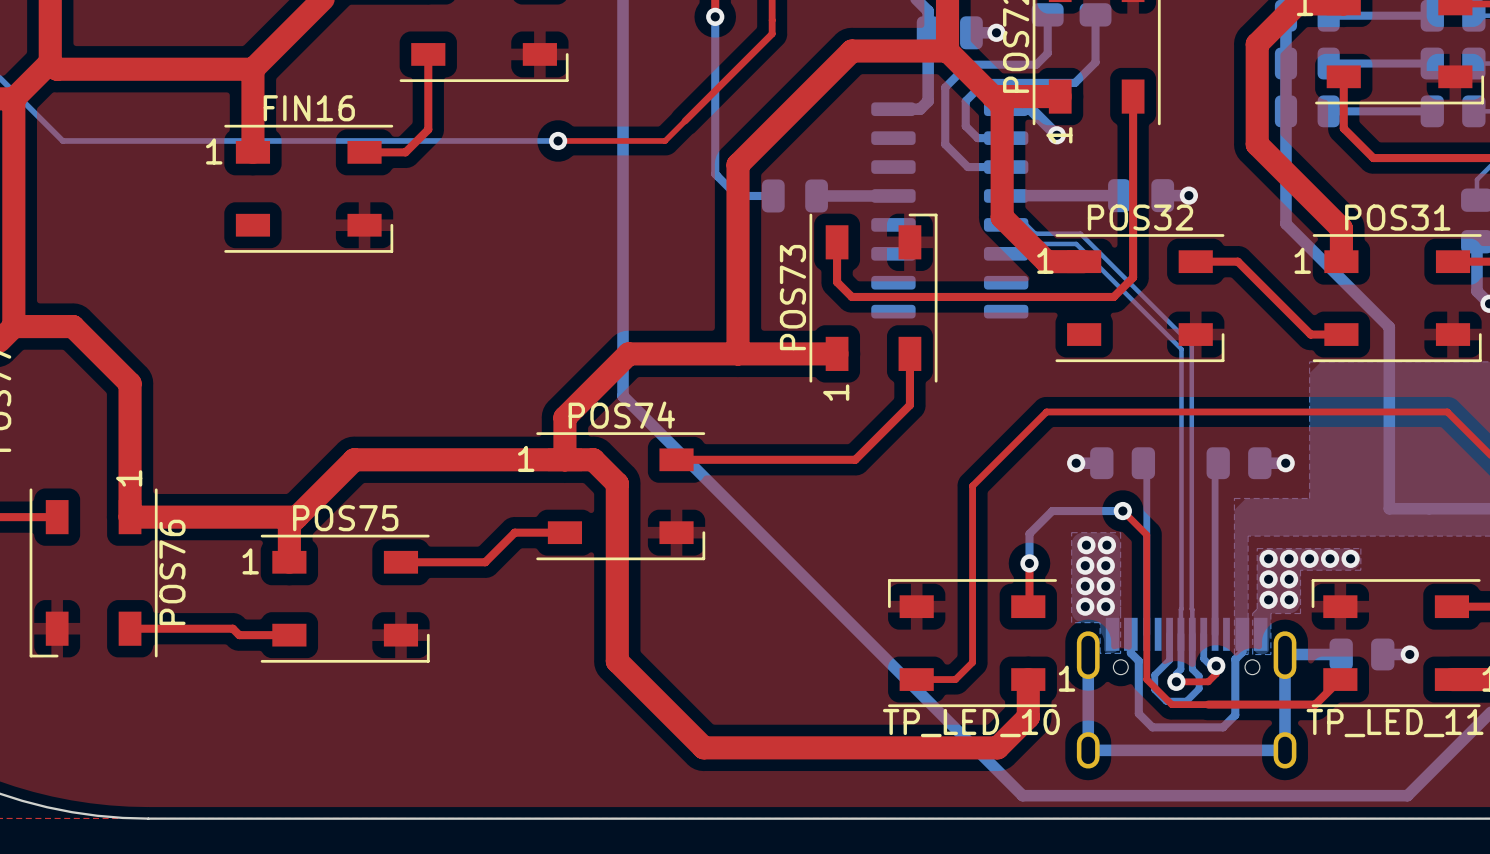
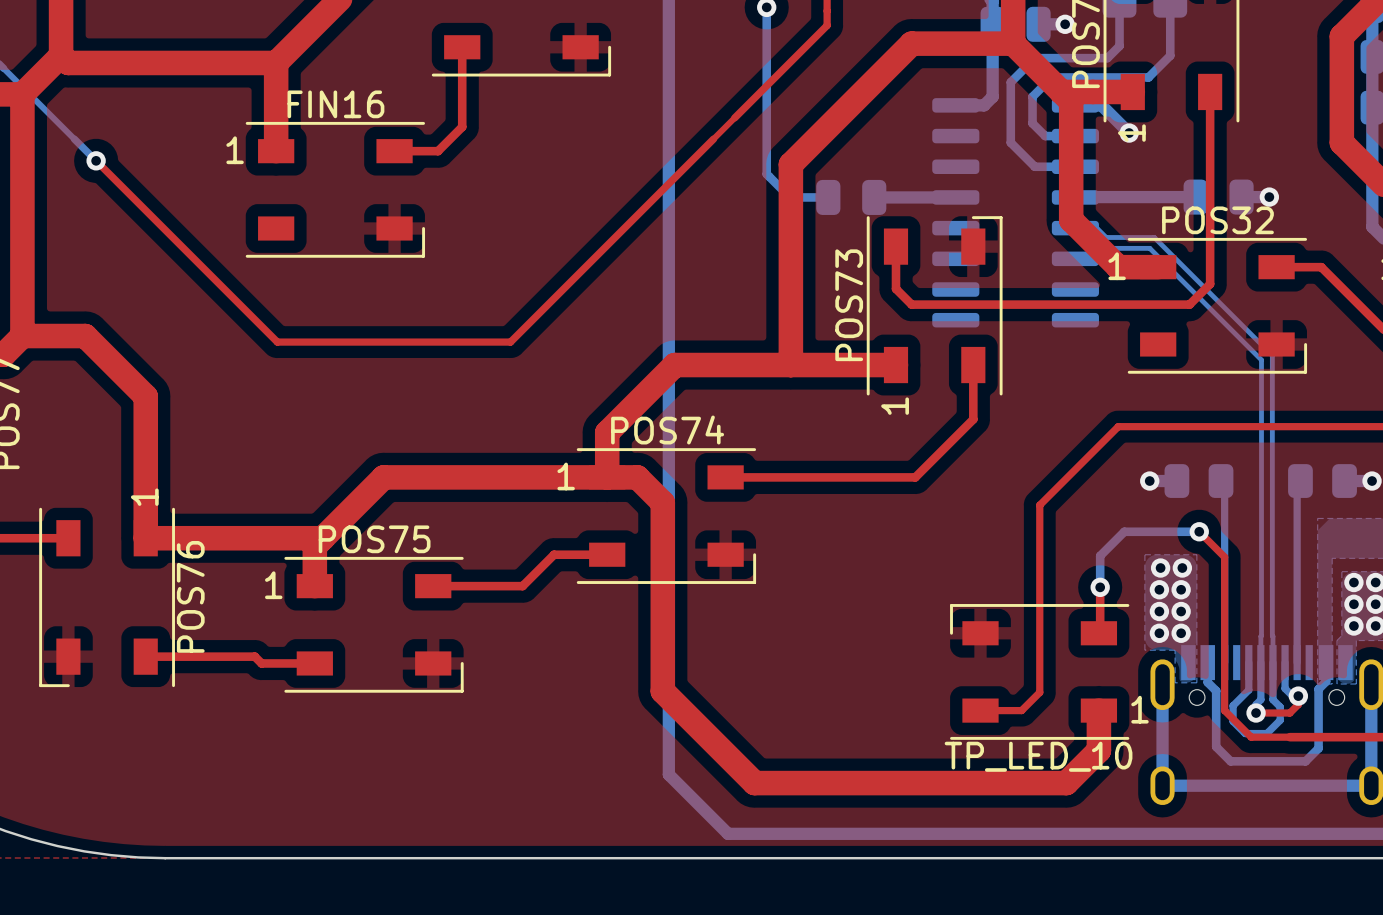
bottom track: (62, 140) (558, 140) -> (74, 139) (96, 160)
top track: (558, 140) (665, 140) -> (96, 160) (277, 342) (510, 342) (713, 139)
via: (558, 140) -> none
via: none -> (96, 160)
bottom track: (623, 396) (1022, 795) -> (668, 409) (668, 774) (728, 833) (1092, 833)

